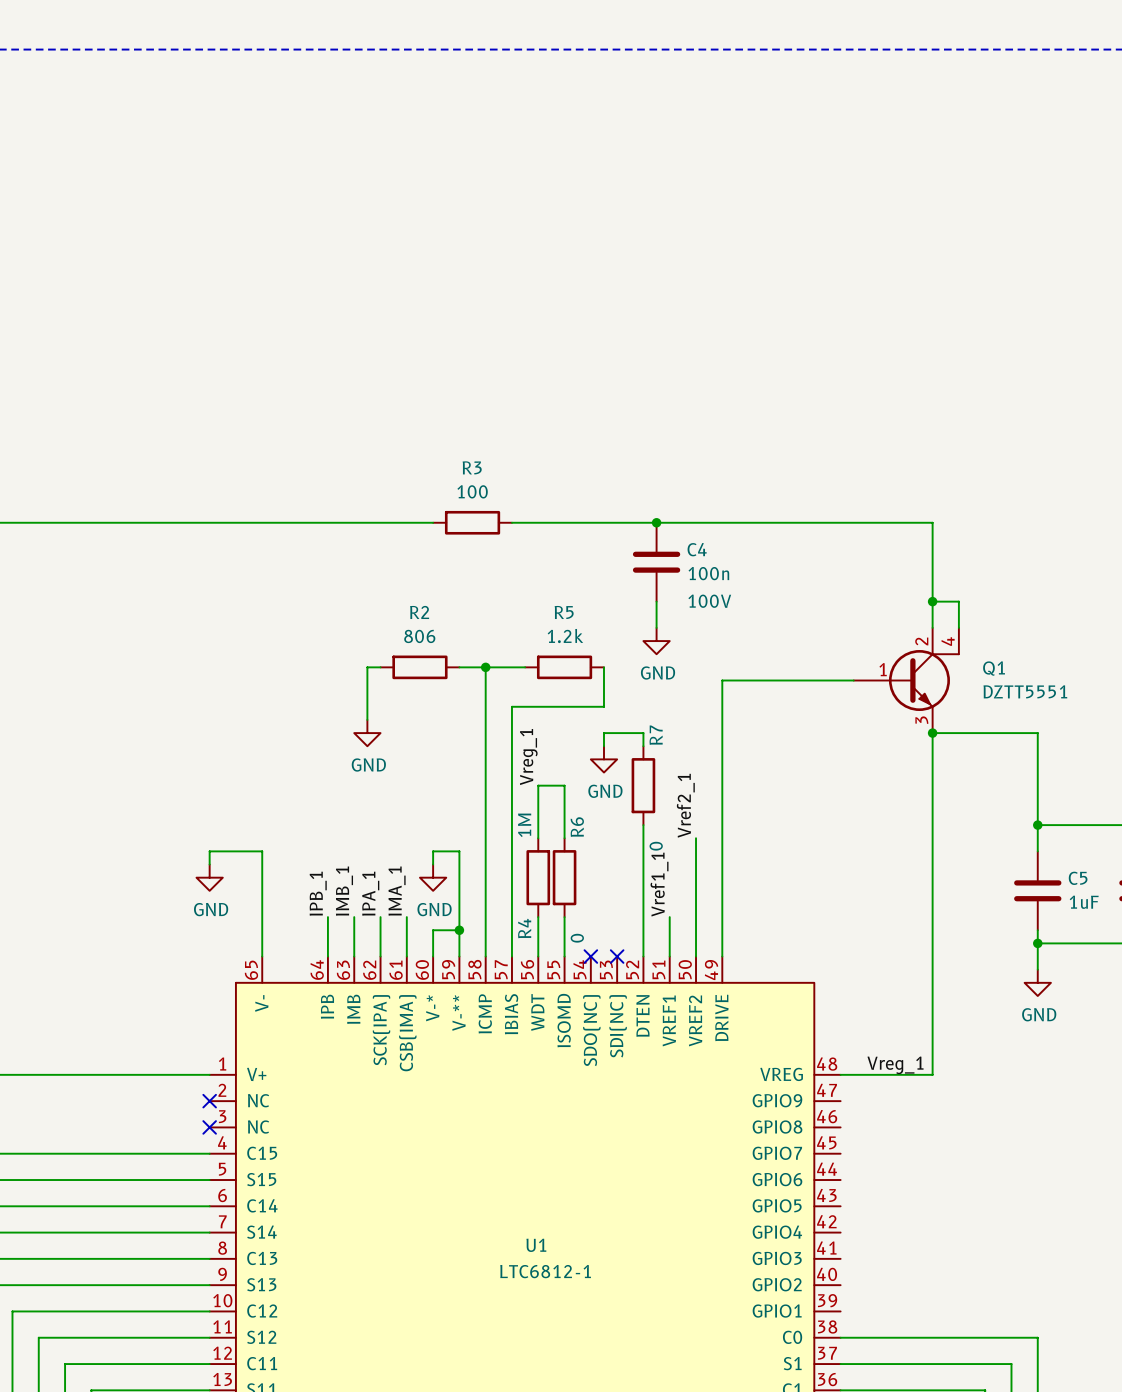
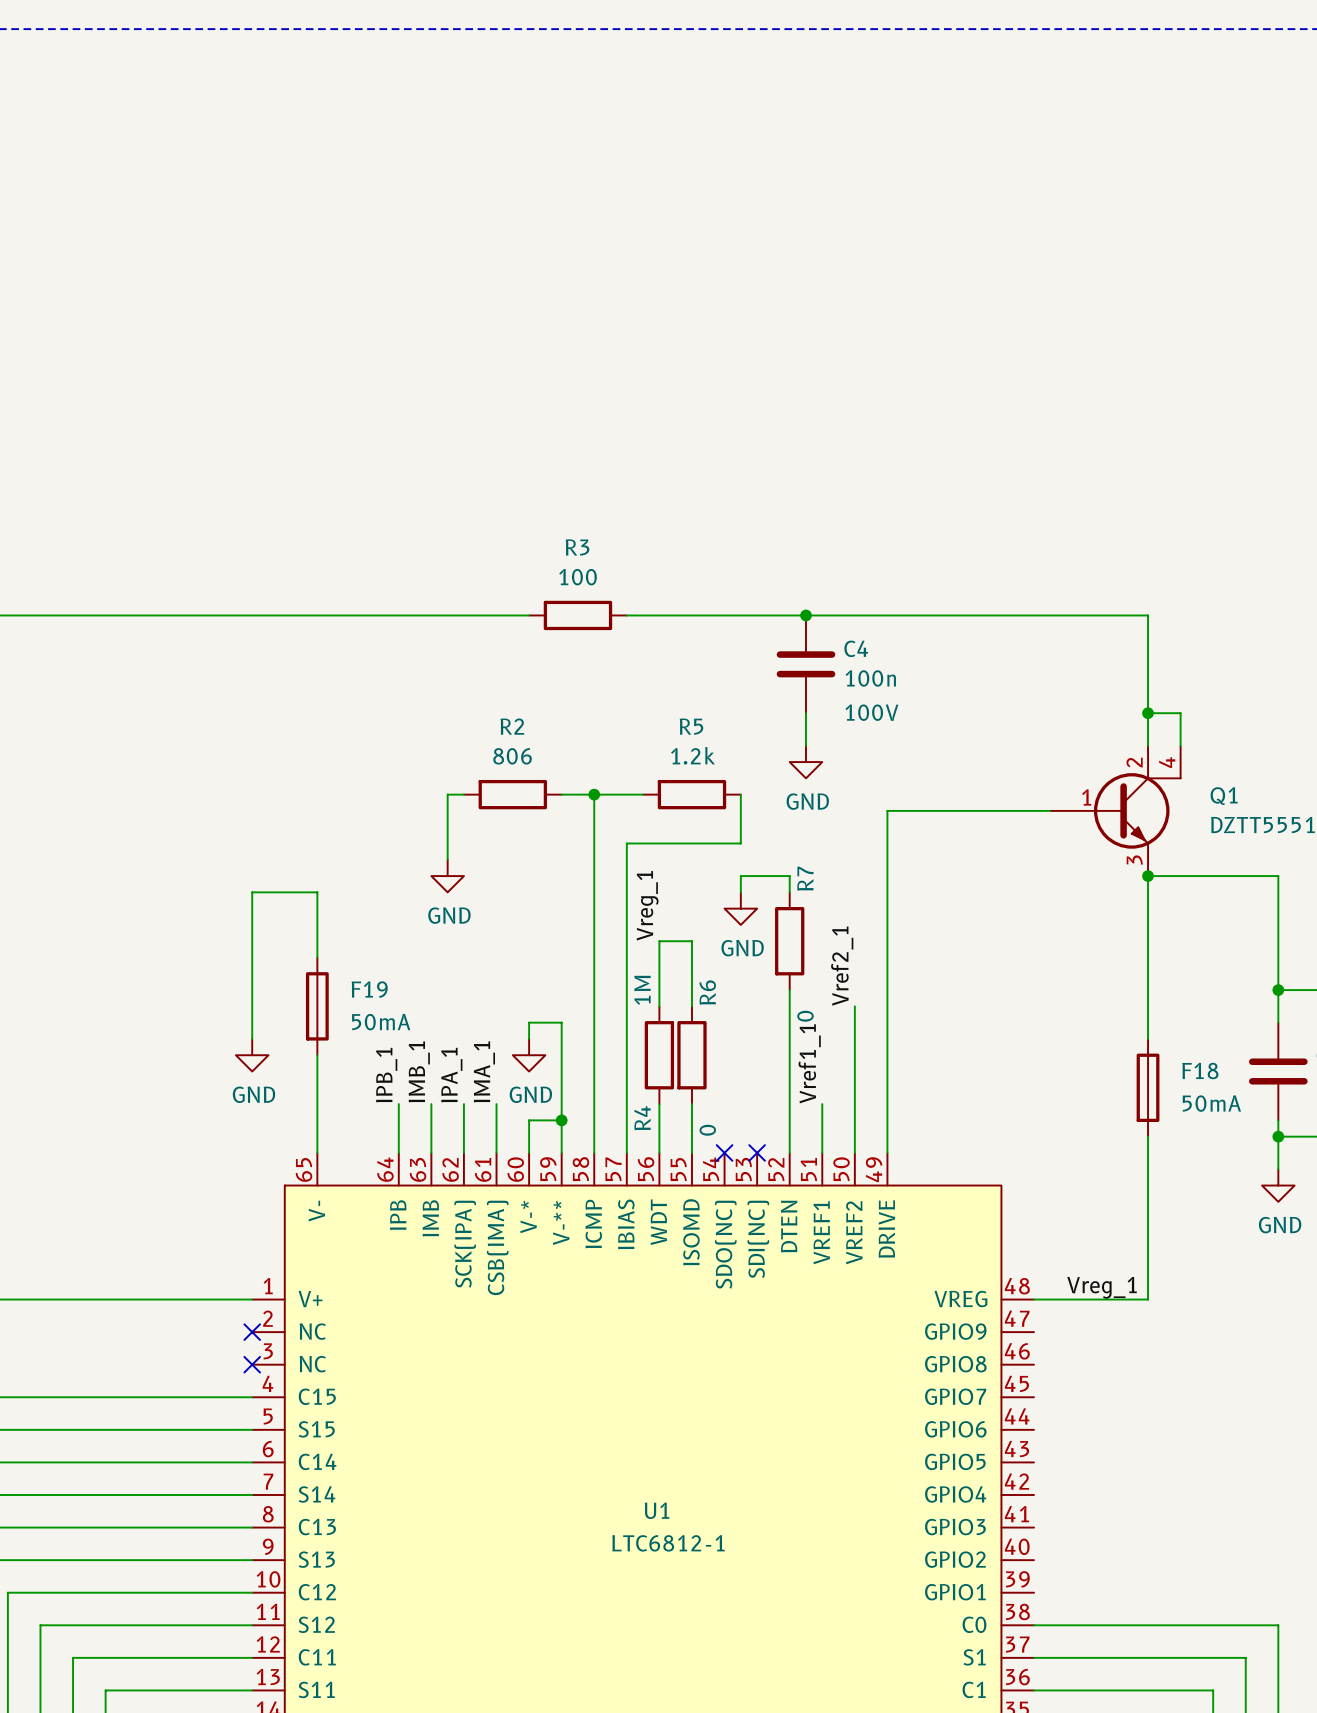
F19: none -> 50mA (317, 1006)
wire: (209, 851) (262, 851) (262, 877) -> (252, 1022) (252, 892) (317, 892) (317, 957)
F18: none -> 50mA (1148, 1087)

